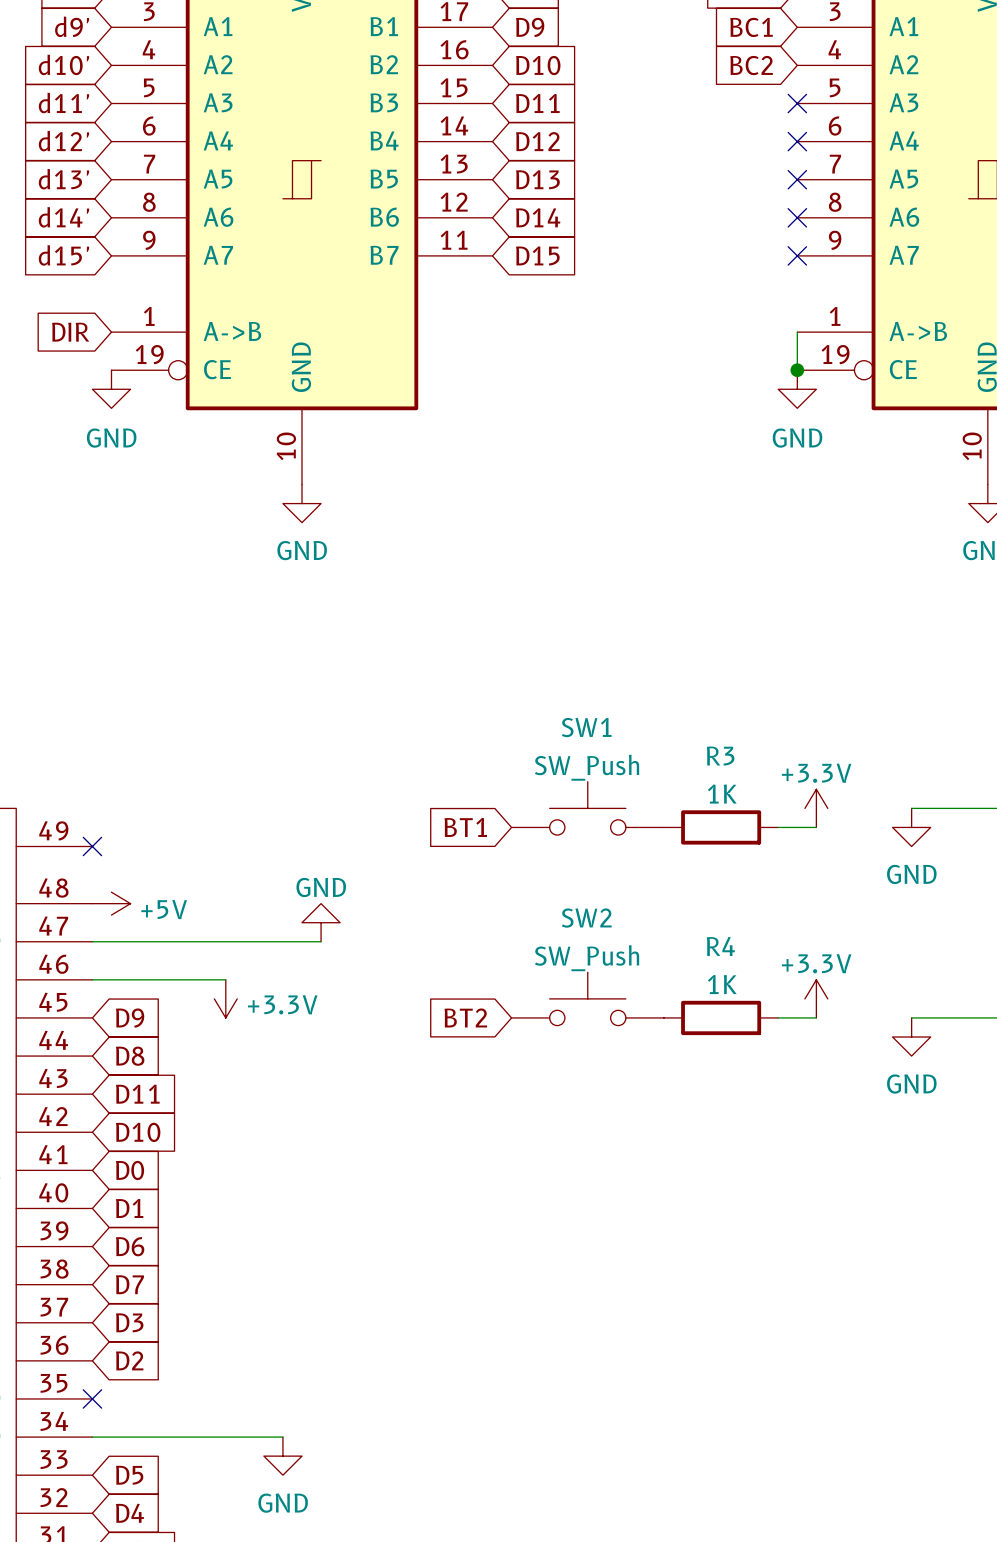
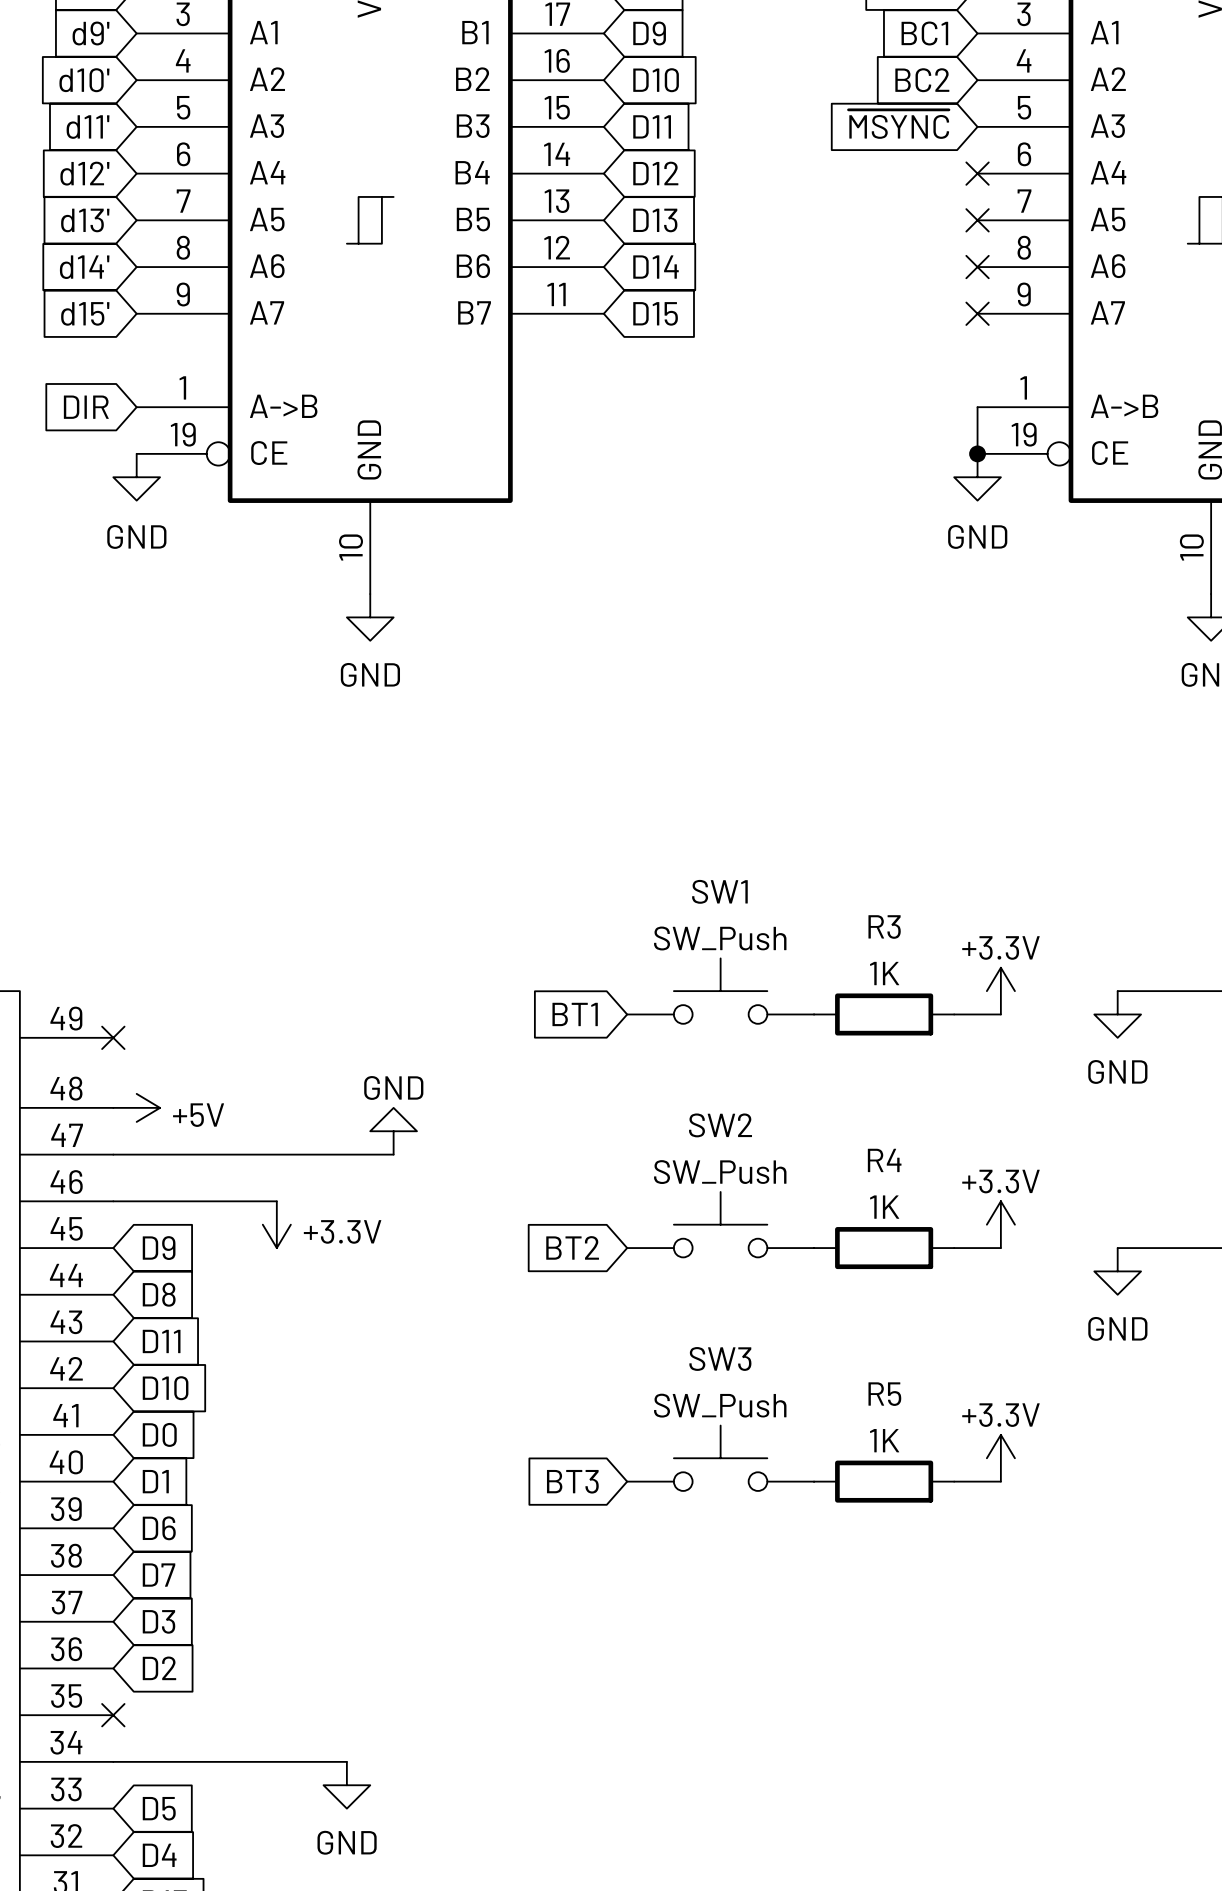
global label: none -> ~{MSYNC} (898, 124)
no-connect mark: (797, 103) -> none
SW3: none -> SW_Push (720, 1458)
power symbol: none -> +3.3V (1000, 1458)
global label: none -> BT3 (572, 1481)
R5: none -> 1K (884, 1481)
wire: none -> (954, 1481) (1000, 1481)

